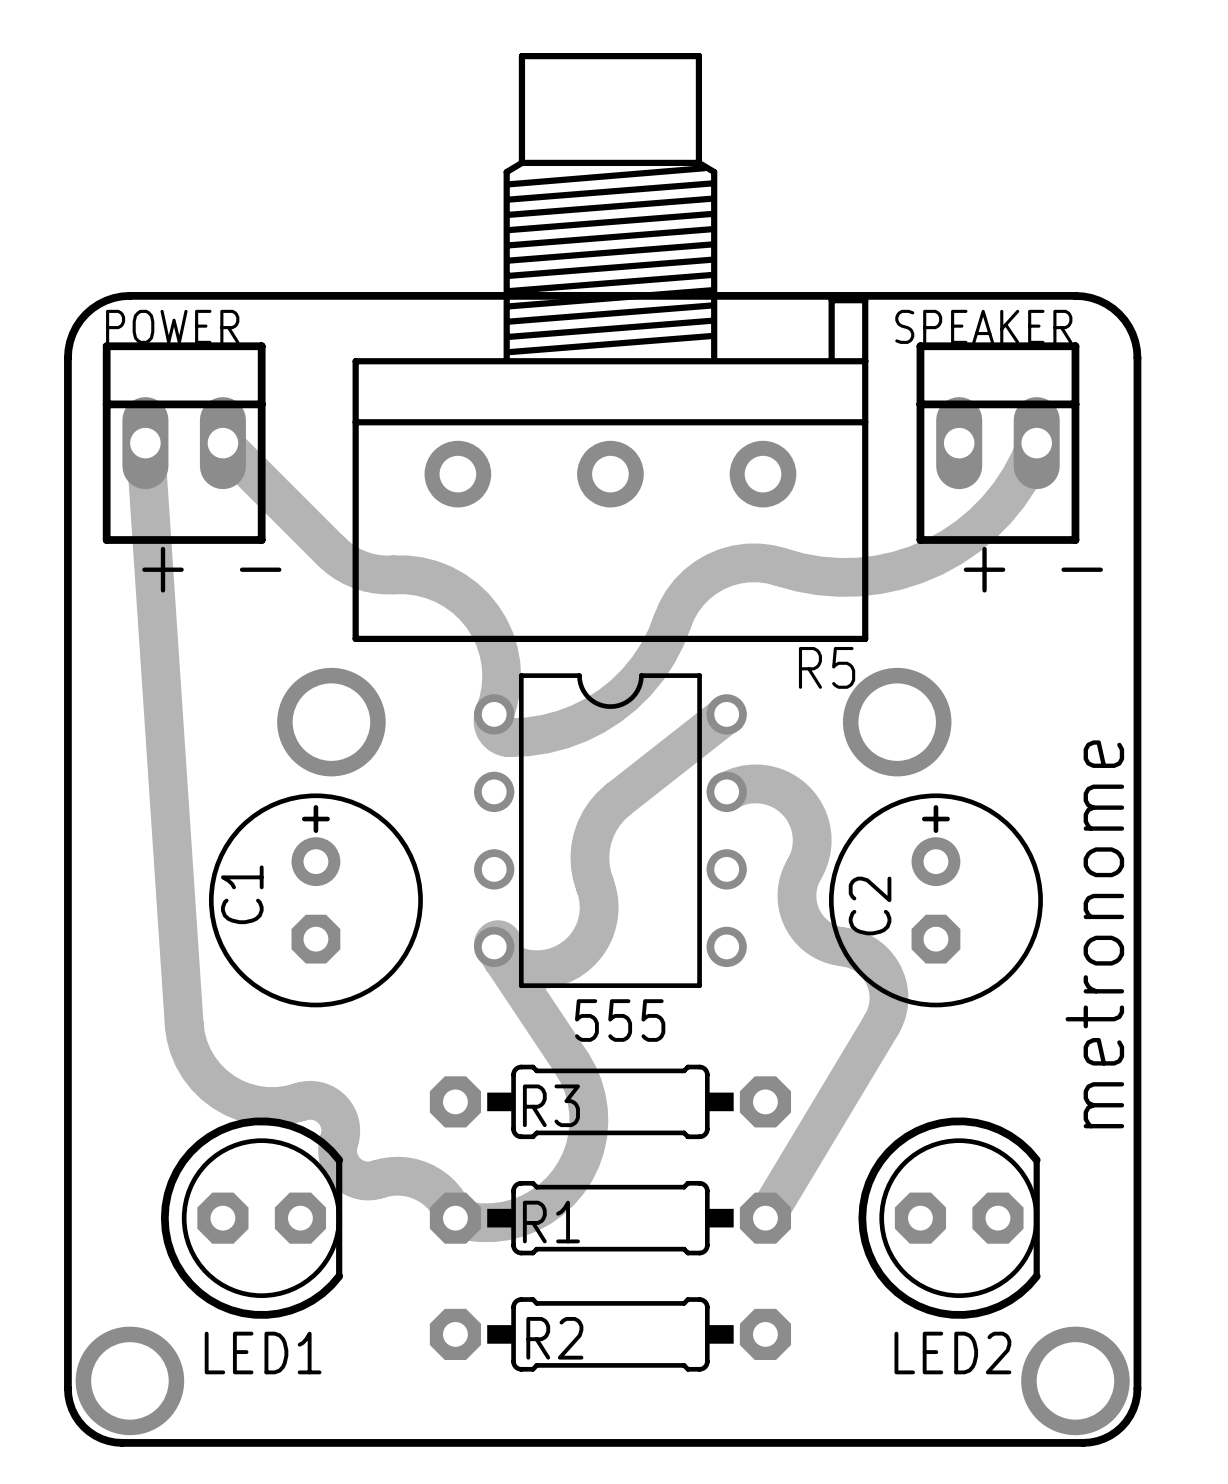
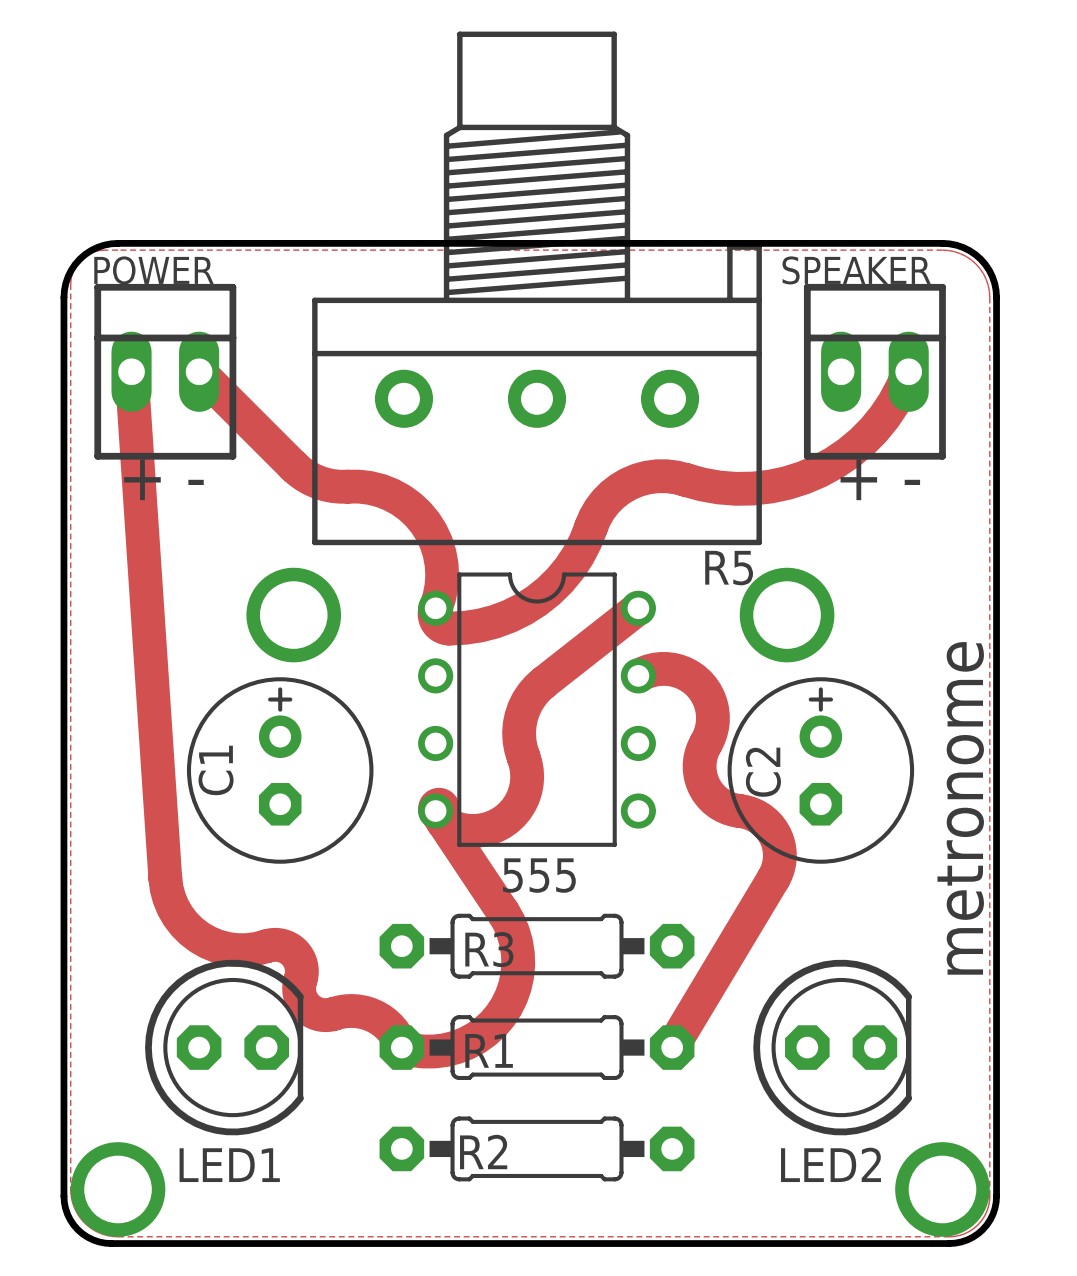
zone outline: none -> (104, 250) (942, 250) (960, 253) (975, 263) (986, 279) (989, 297) (989, 1196) (986, 1211) (977, 1224) (964, 1233) (949, 1236) (118, 1236) (99, 1233) (84, 1222) (74, 1207) (70, 1189) (70, 283) (73, 270) (80, 260) (91, 252) (104, 250)

